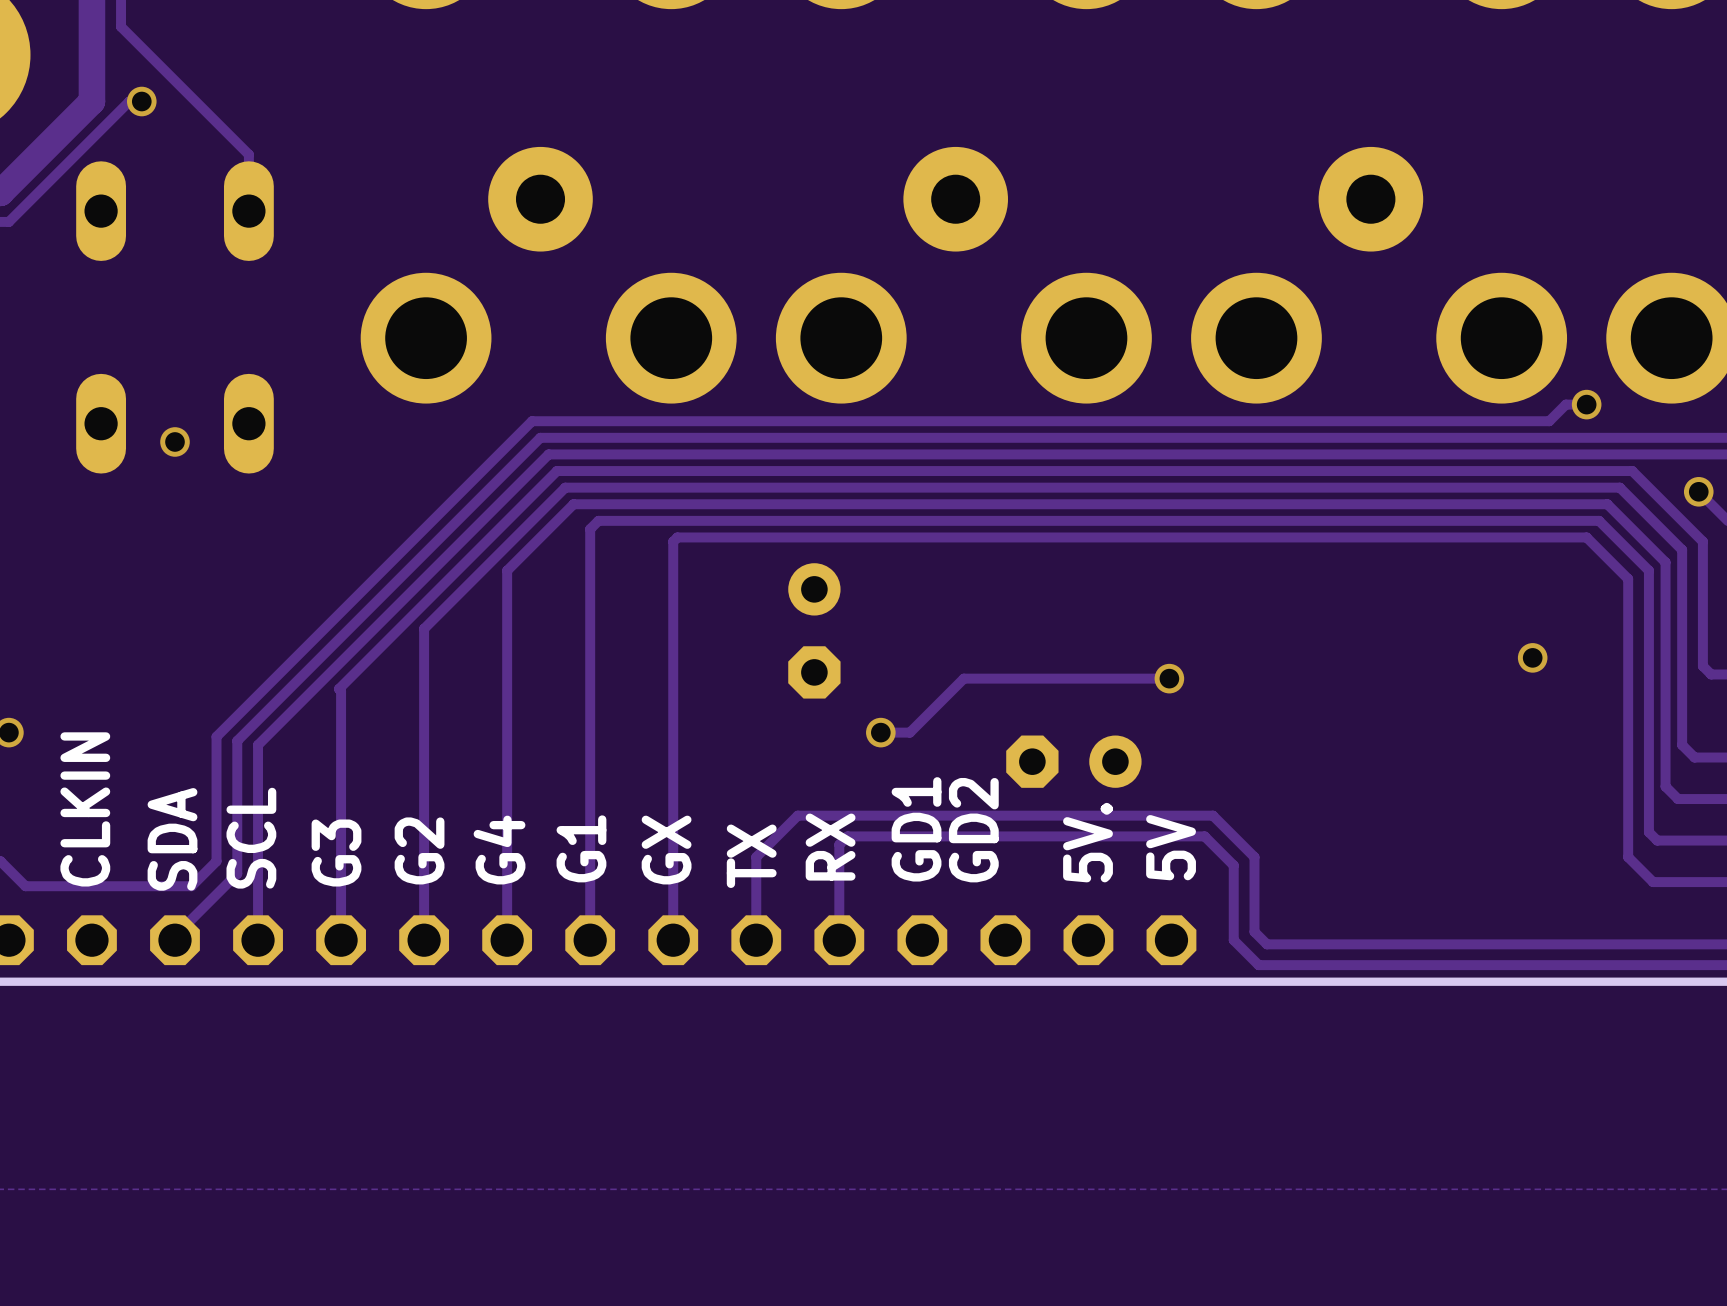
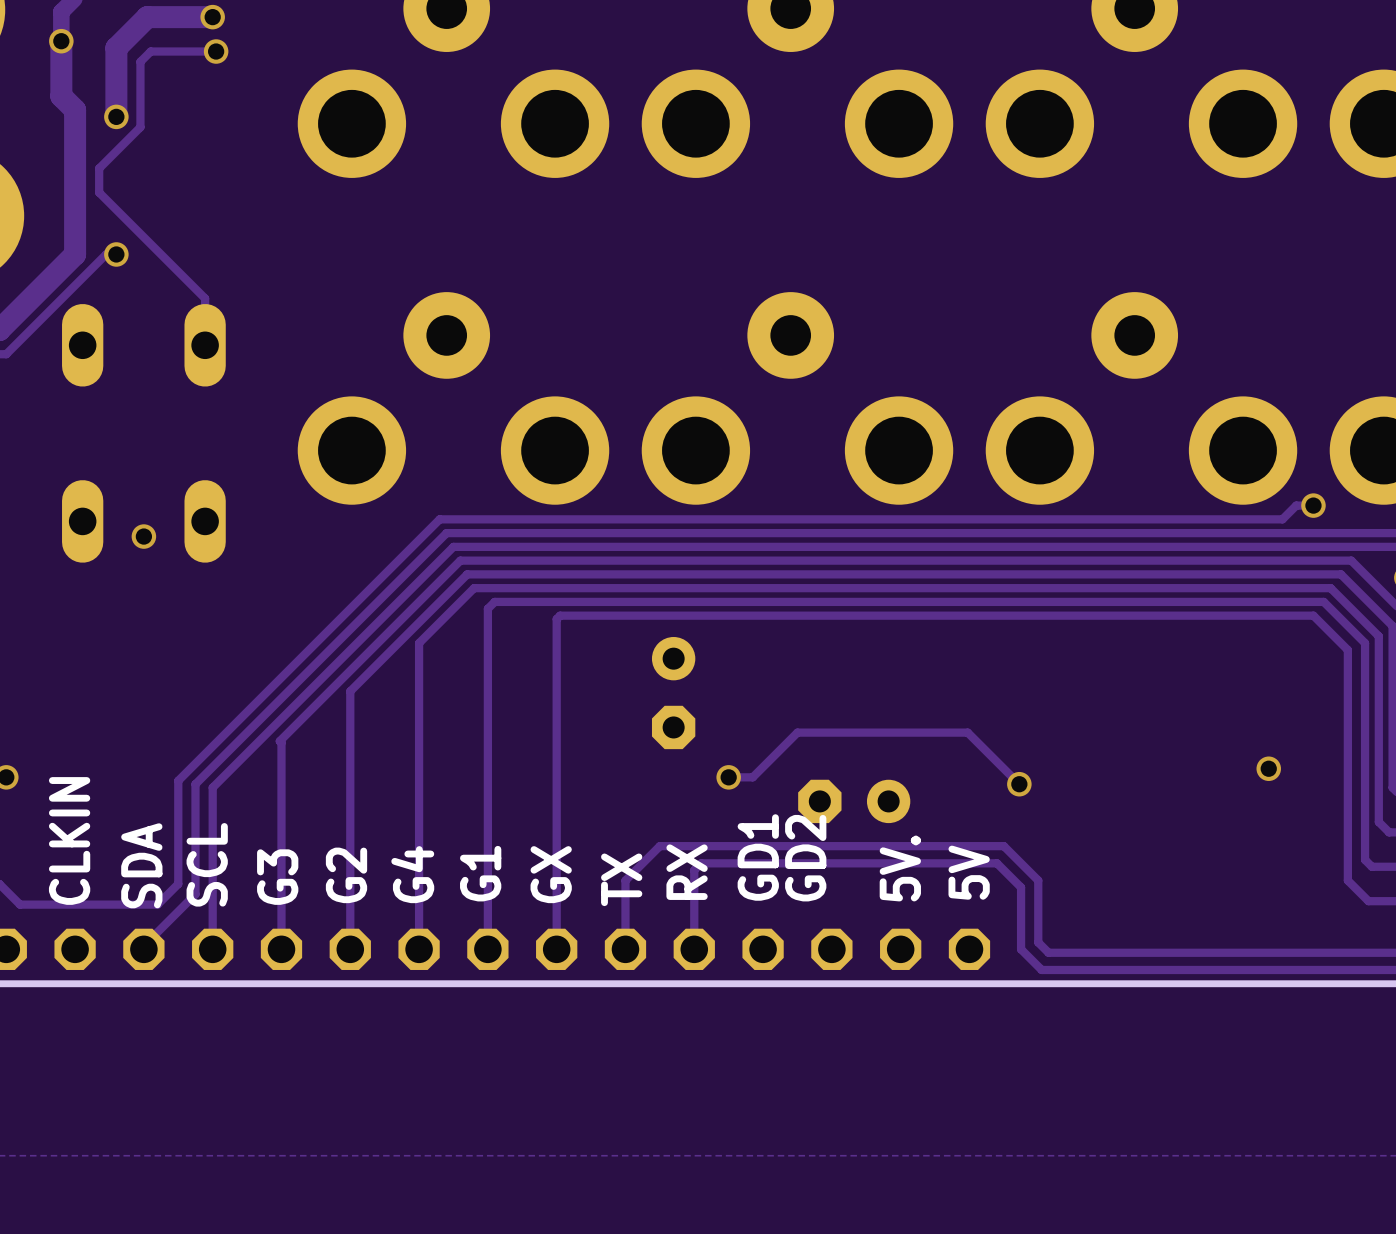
via position: (1532, 657) -> (1268, 768)
track: none -> (967, 732) (1019, 784)
via position: (1169, 678) -> (1019, 784)
part position: (1073, 761) -> (854, 801)

